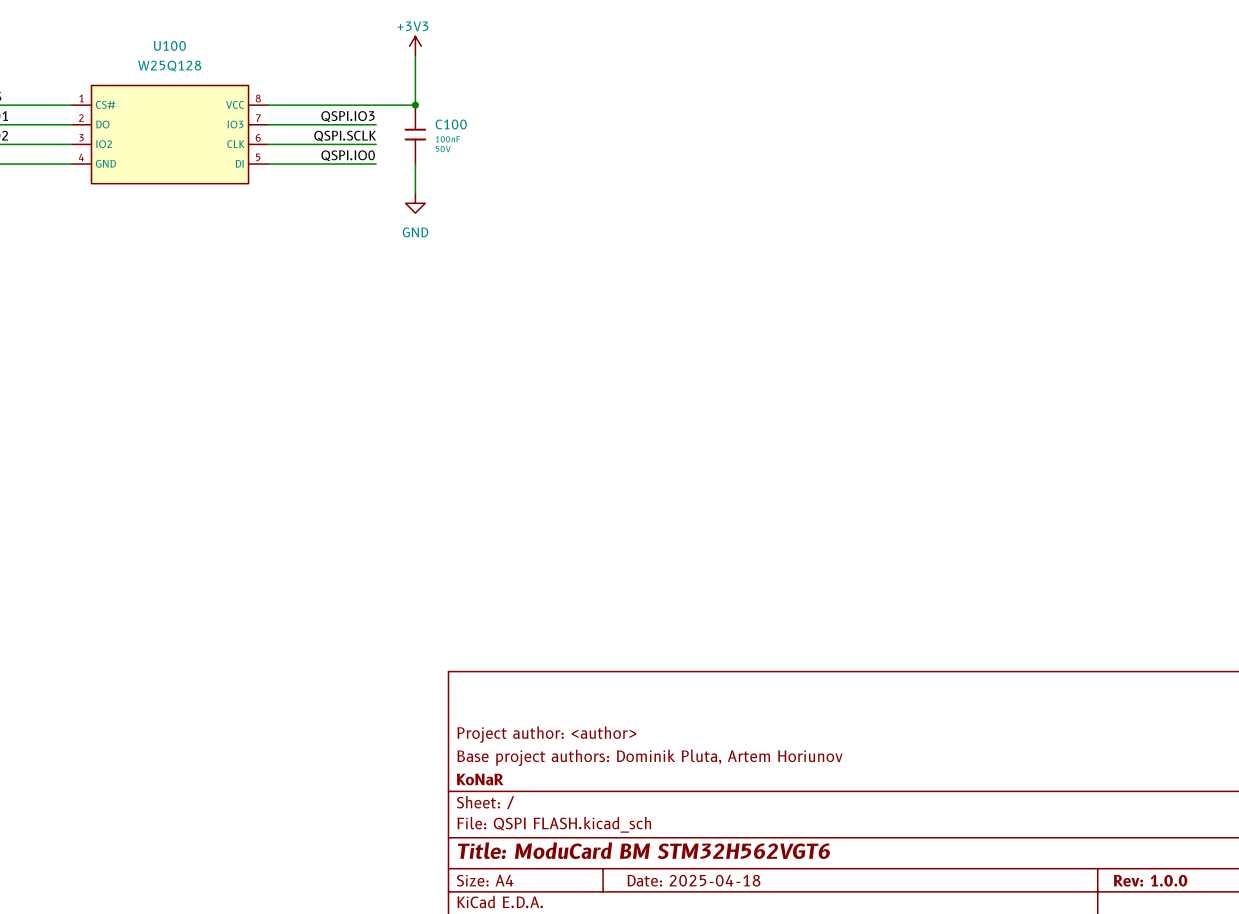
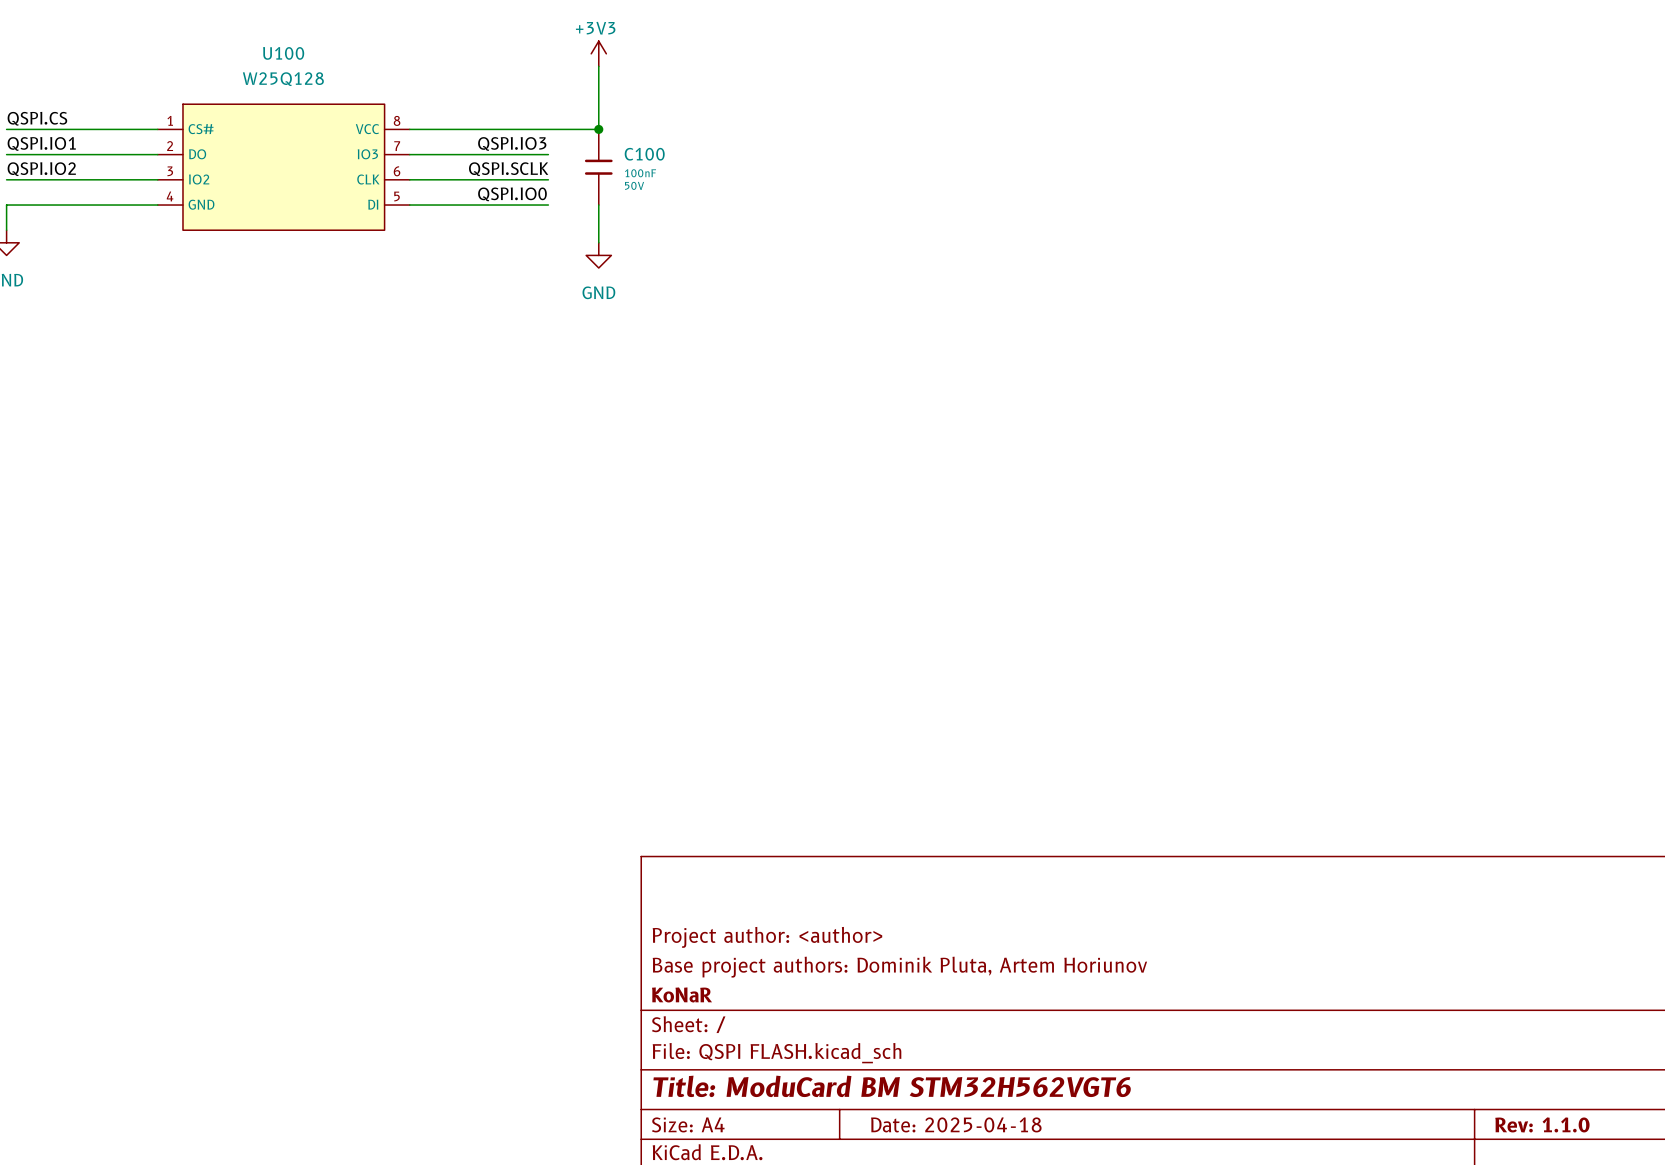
title block: Rev: 1.0.0 (1150, 880) -> Rev: 1.1.0 (1542, 1124)

